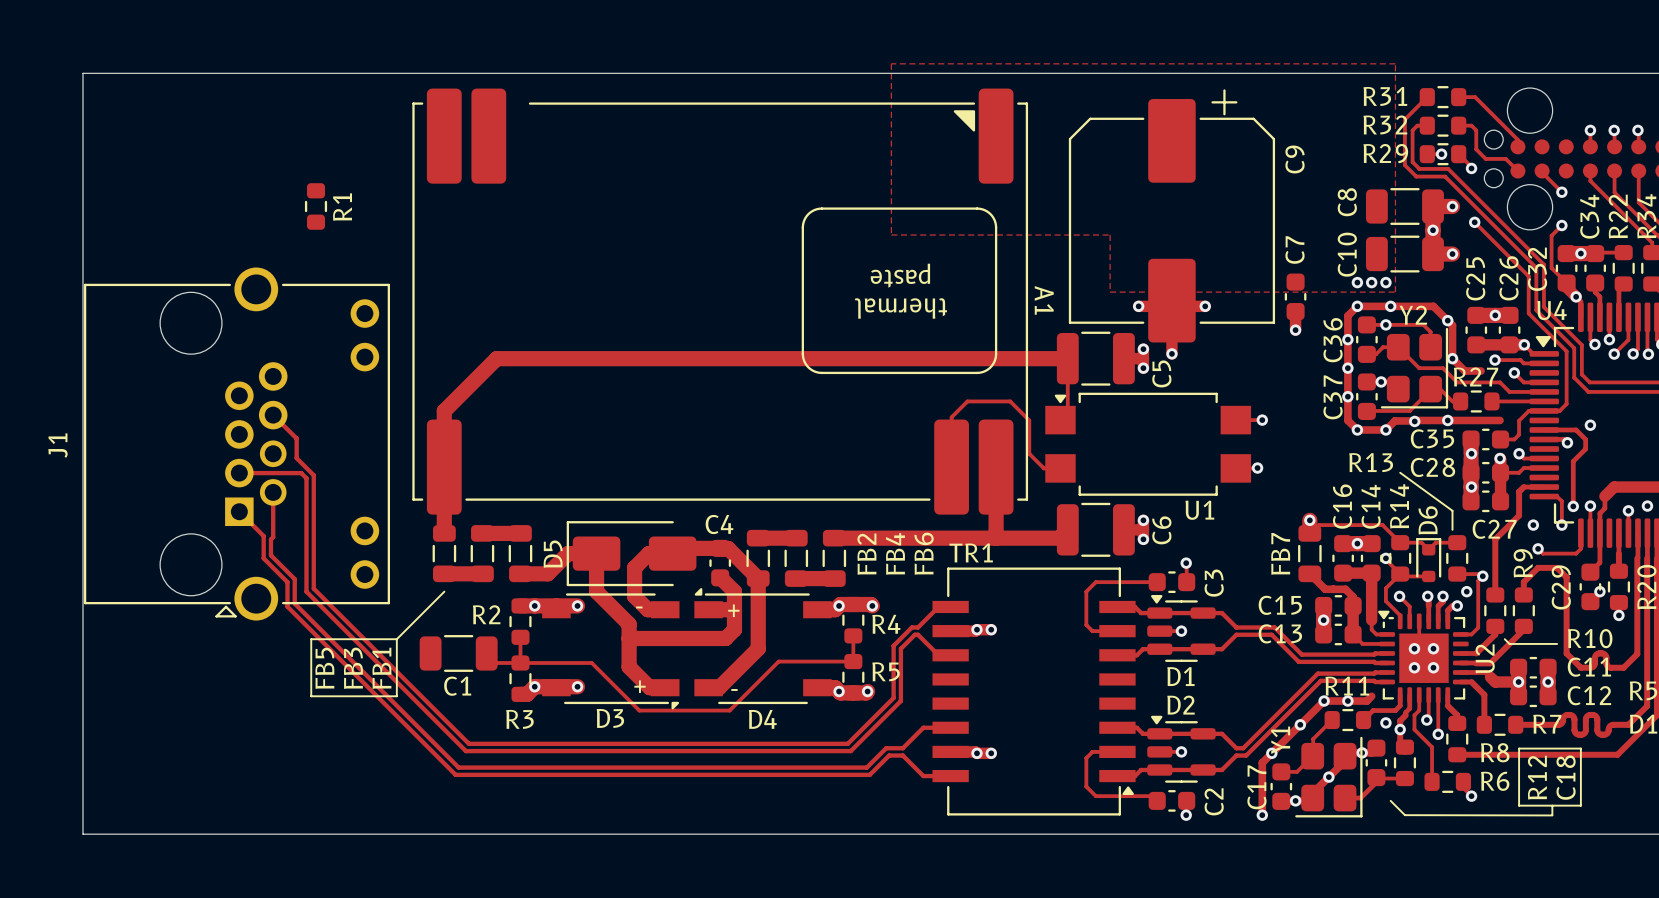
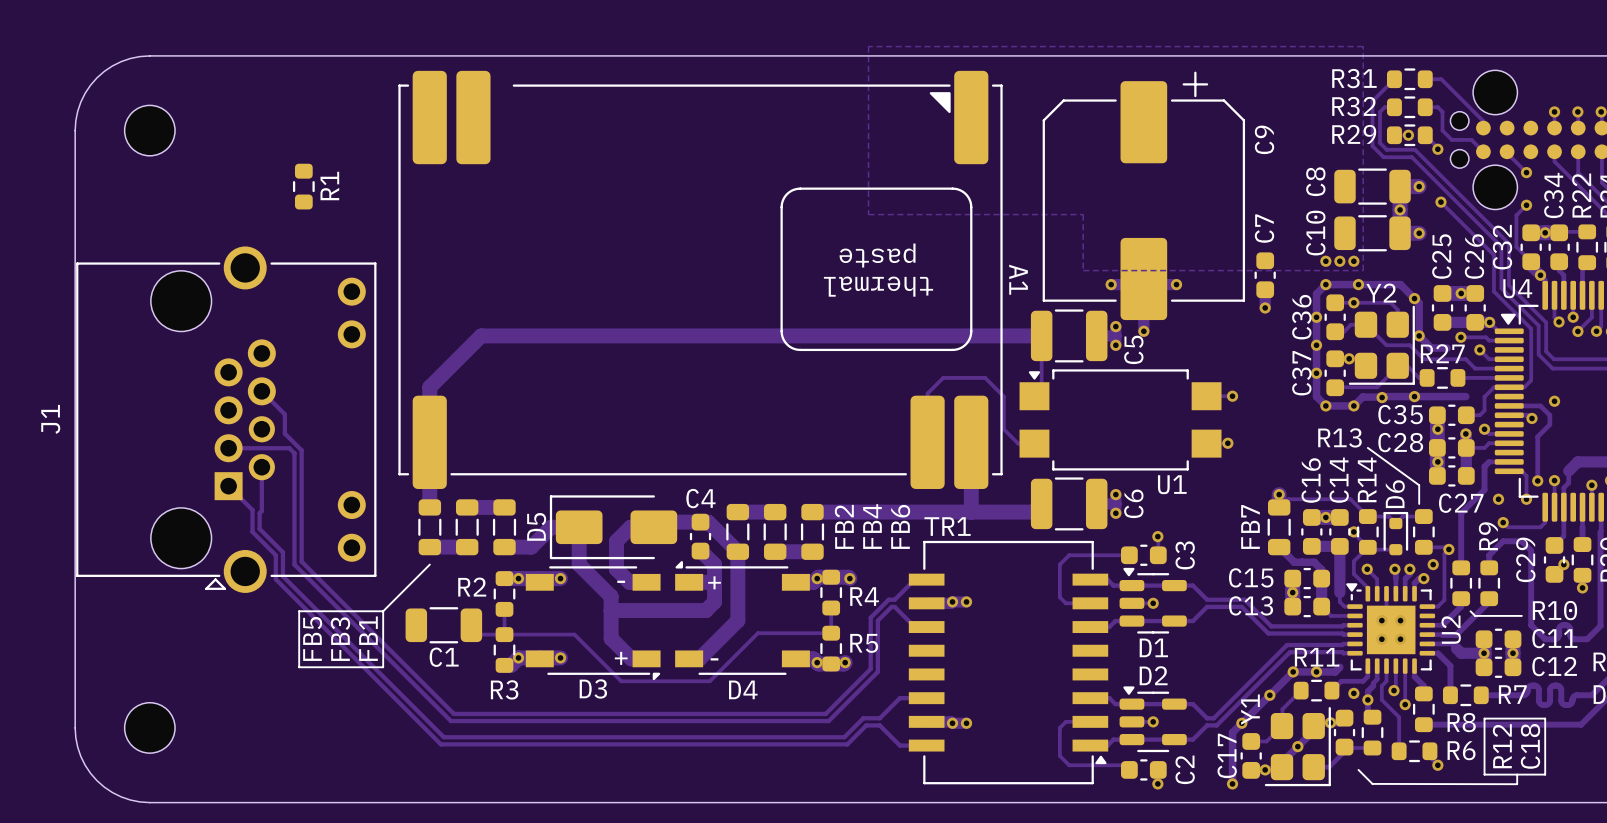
board edge: (159, 73) (83, 73) (83, 149) -> (149, 55) (121, 61) (97, 77) (80, 102) (75, 130)
part: none -> (149, 130)
board edge: (83, 758) (83, 834) (159, 834) -> (75, 727) (80, 756) (97, 780) (121, 796) (149, 802)
part: none -> (149, 727)

